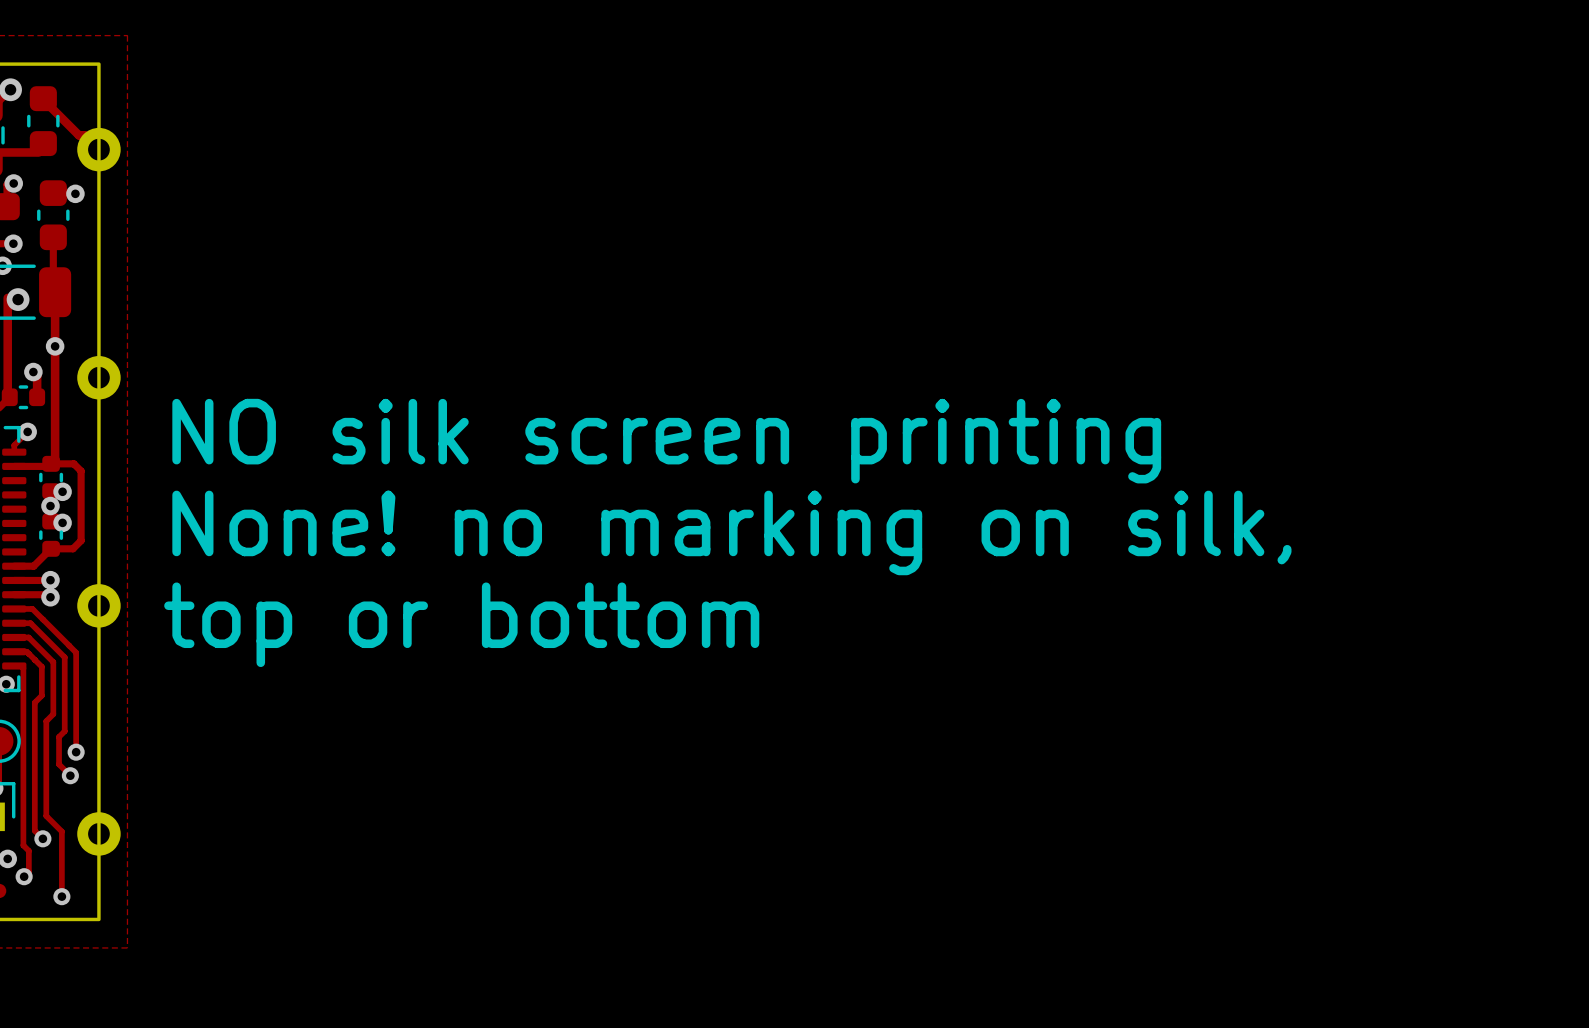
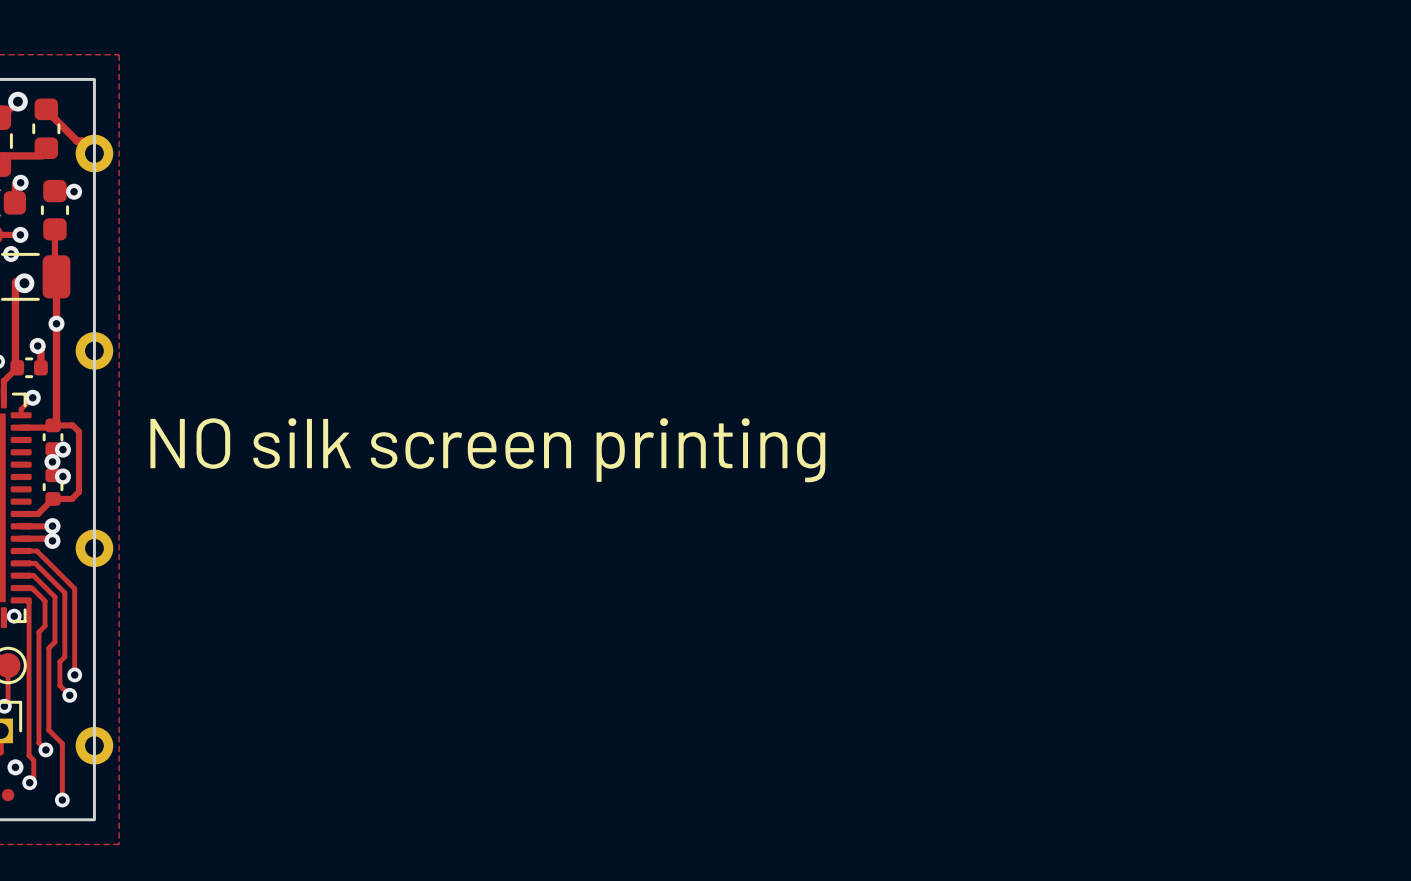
text position: NO silk screen printing (666, 441) -> NO silk screen printing (487, 450)
text: None! no marking on silk, (731, 532) -> none
text: top or bottom (461, 624) -> none

